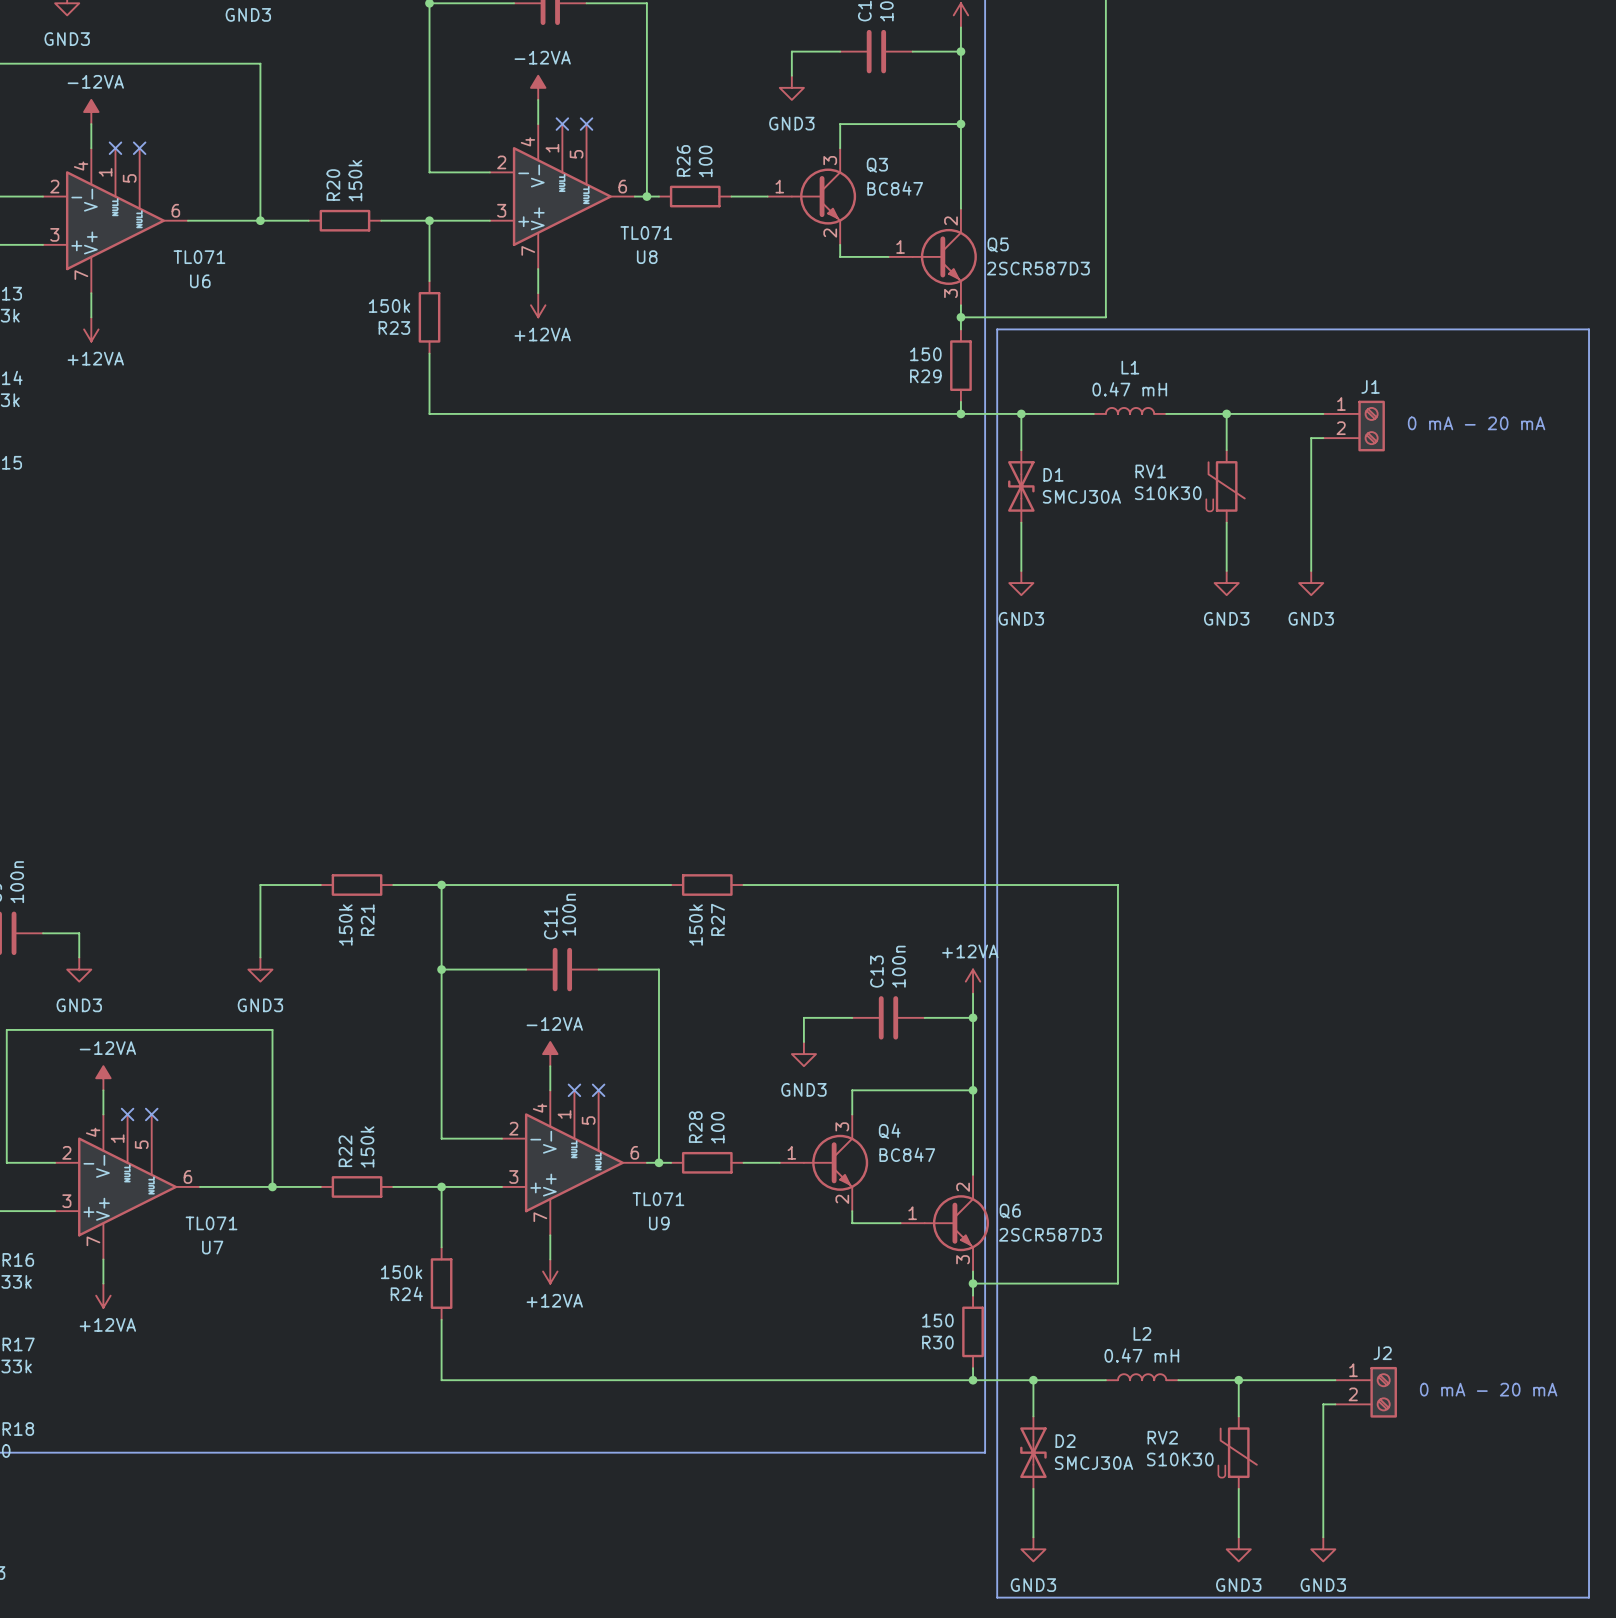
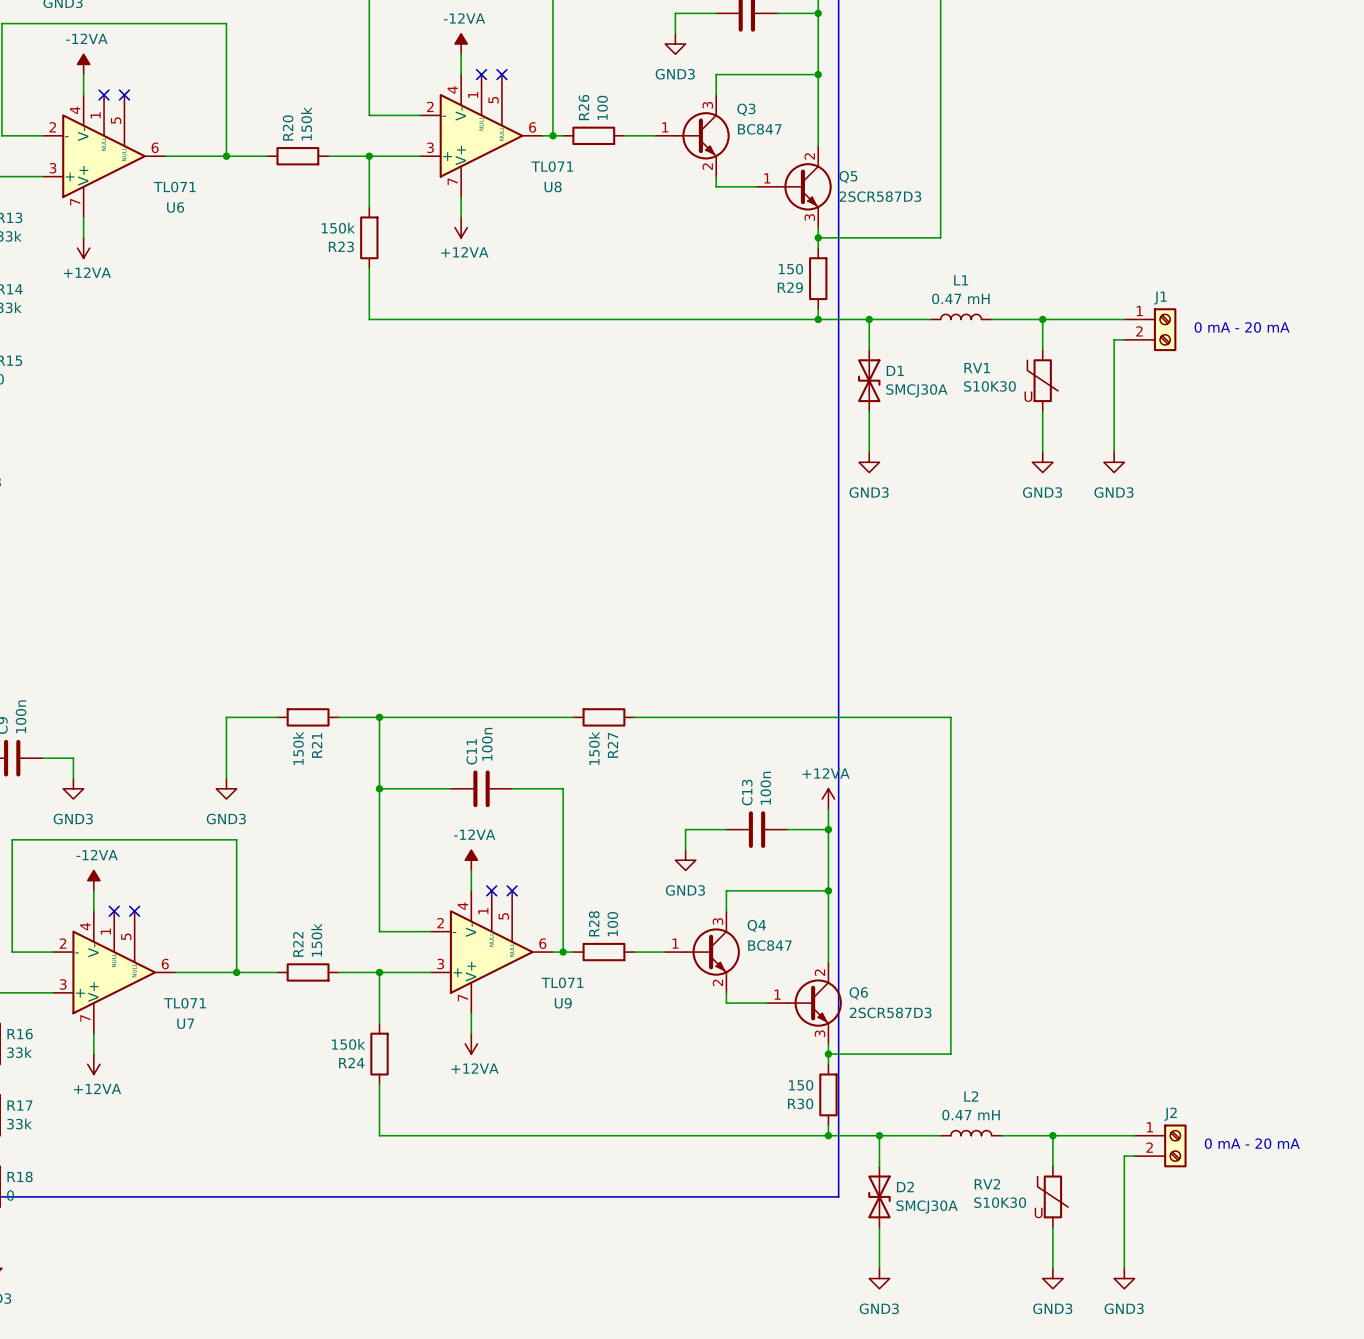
line: (997, 329) (1589, 329) (1589, 1597) (997, 1597) (997, 329) -> none

